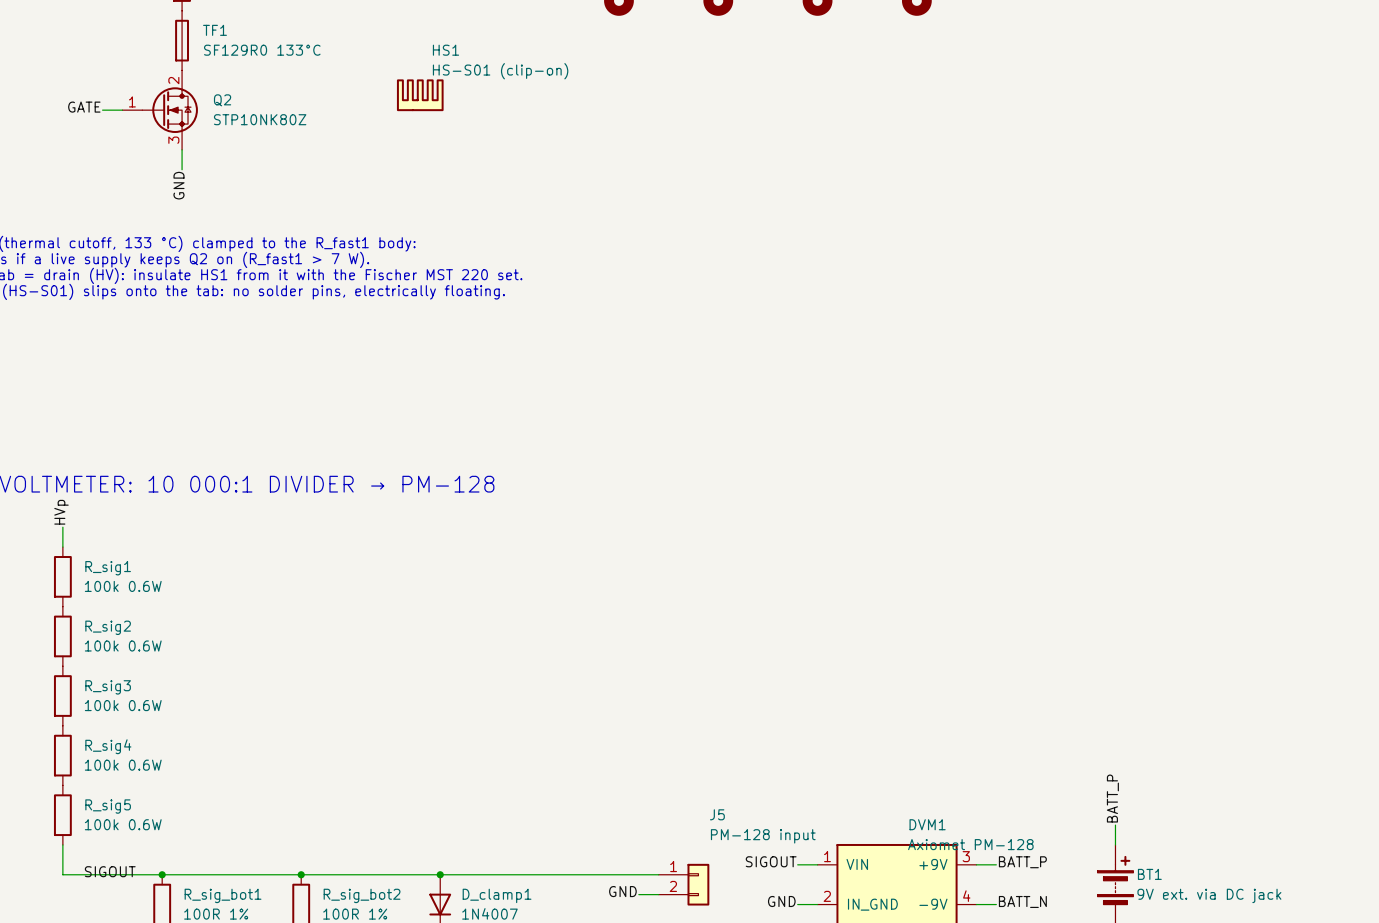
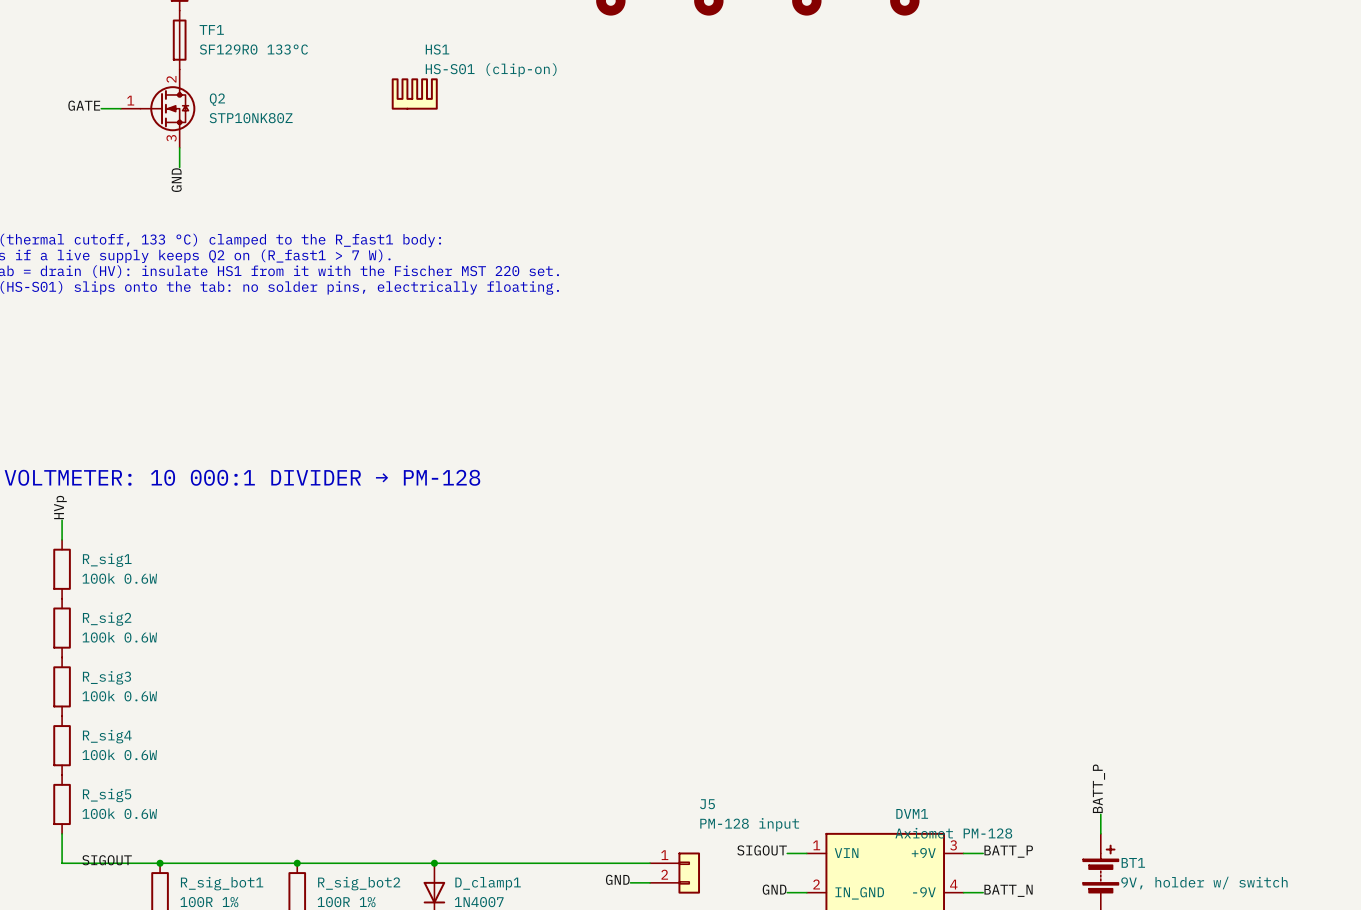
BT1 value: 9V ext. via DC jack (1209, 895) -> 9V, holder w/ switch (1204, 883)

